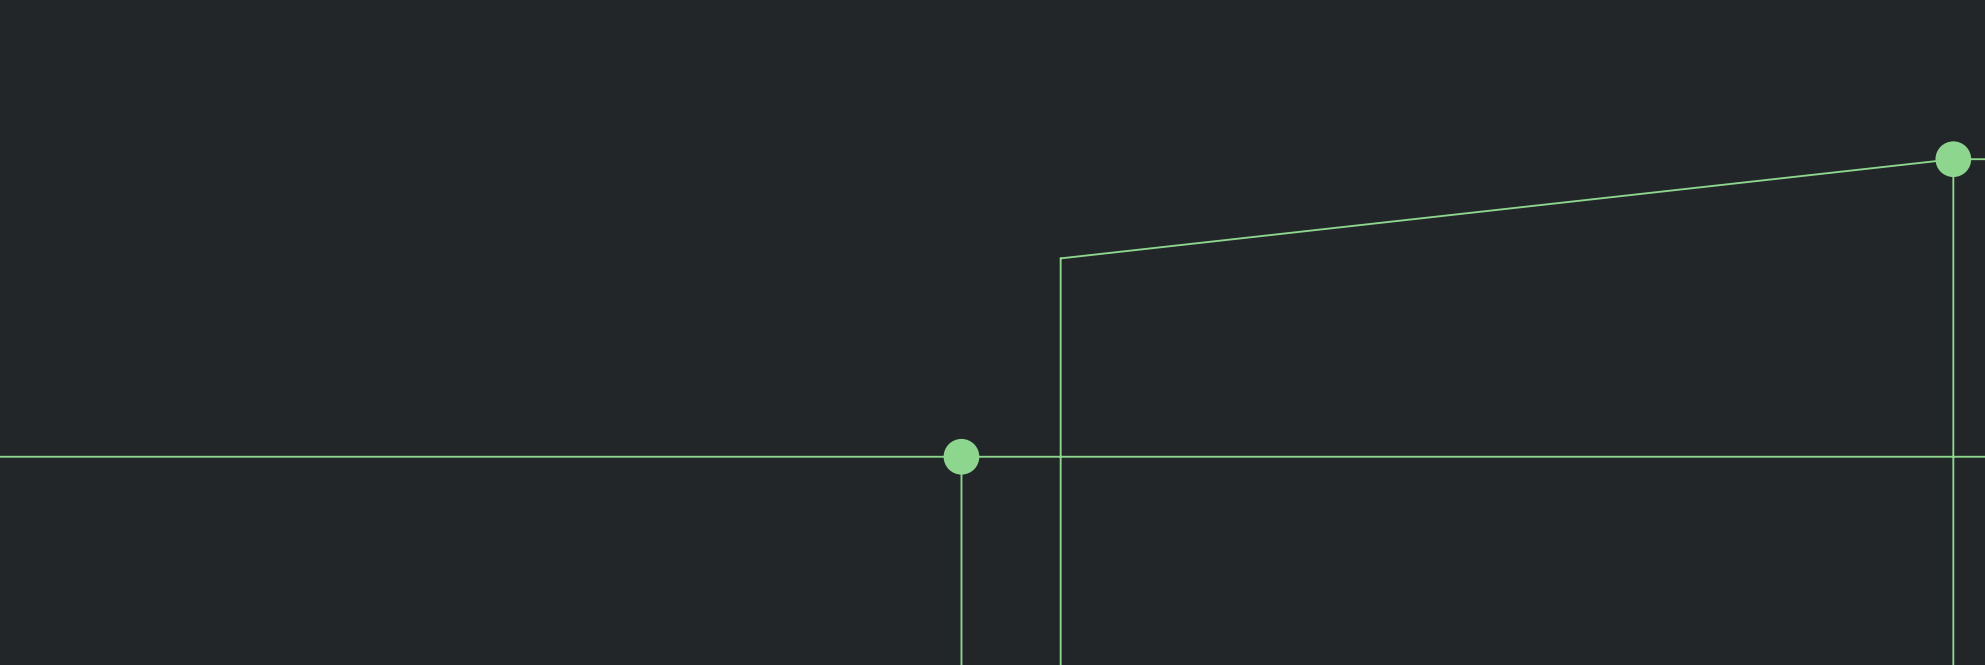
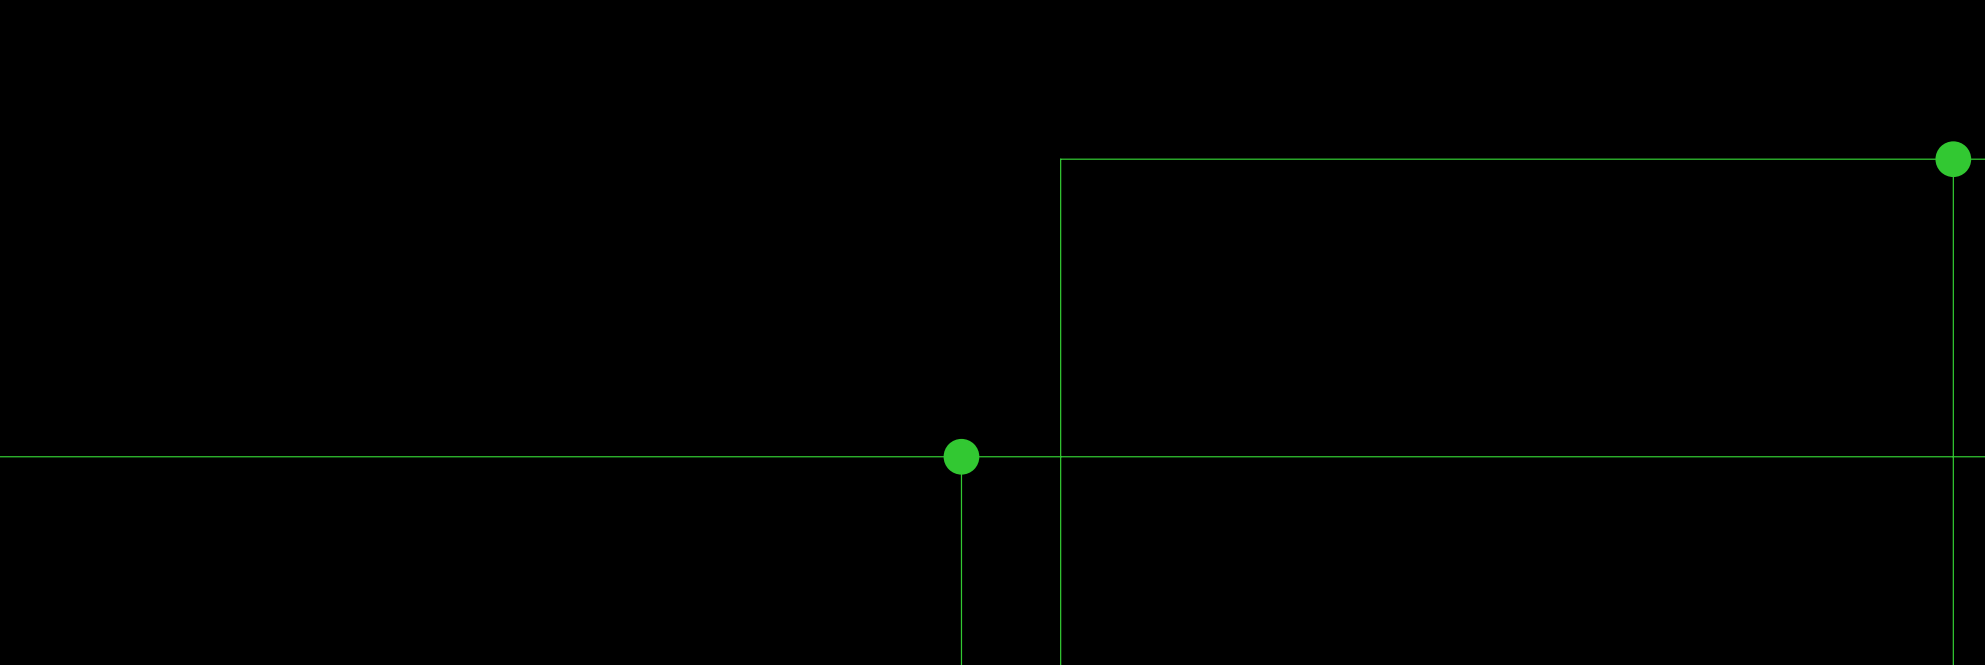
wire: (1953, 159) (1060, 258) -> (1953, 159) (1060, 159) (1060, 258)

